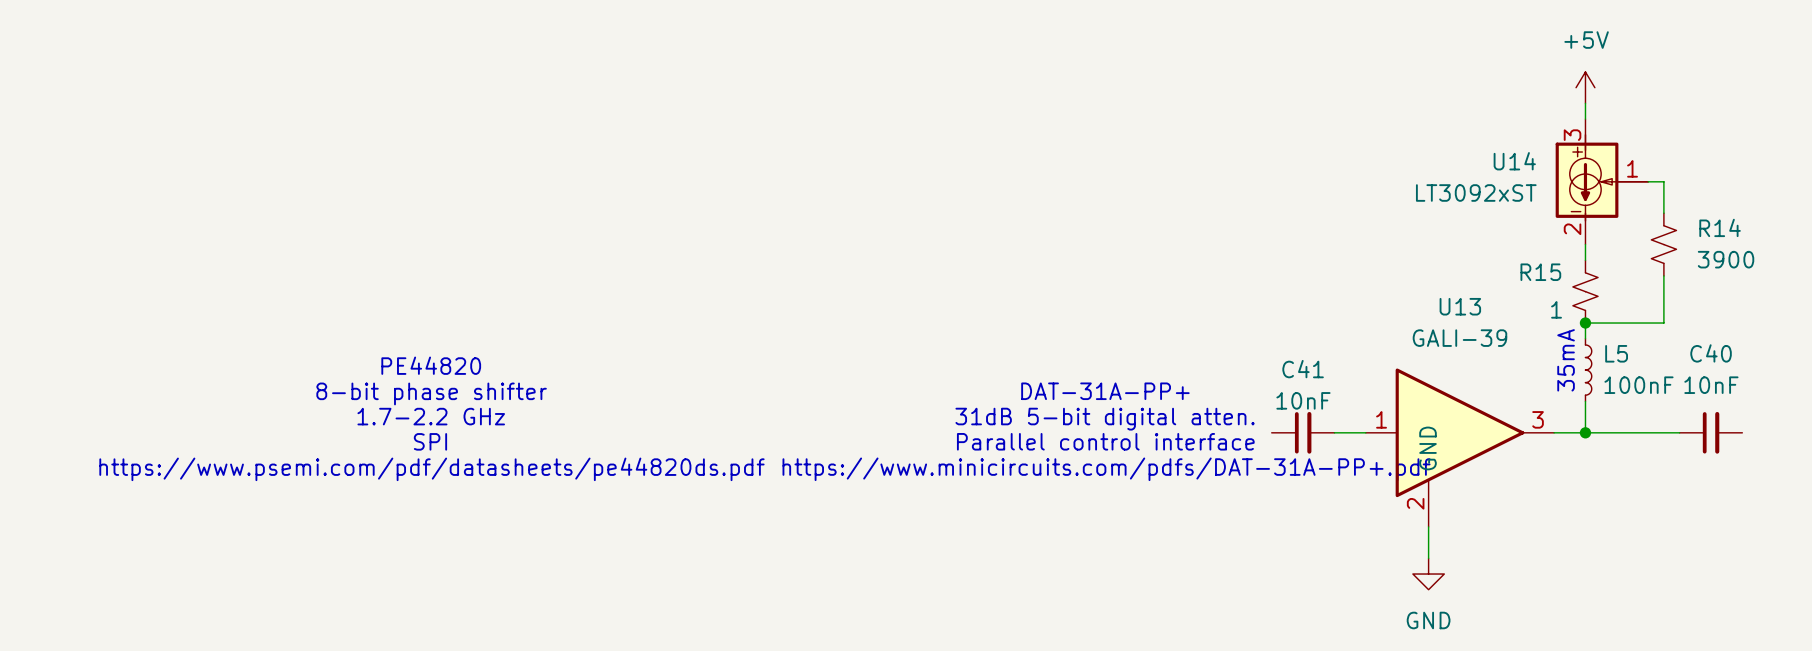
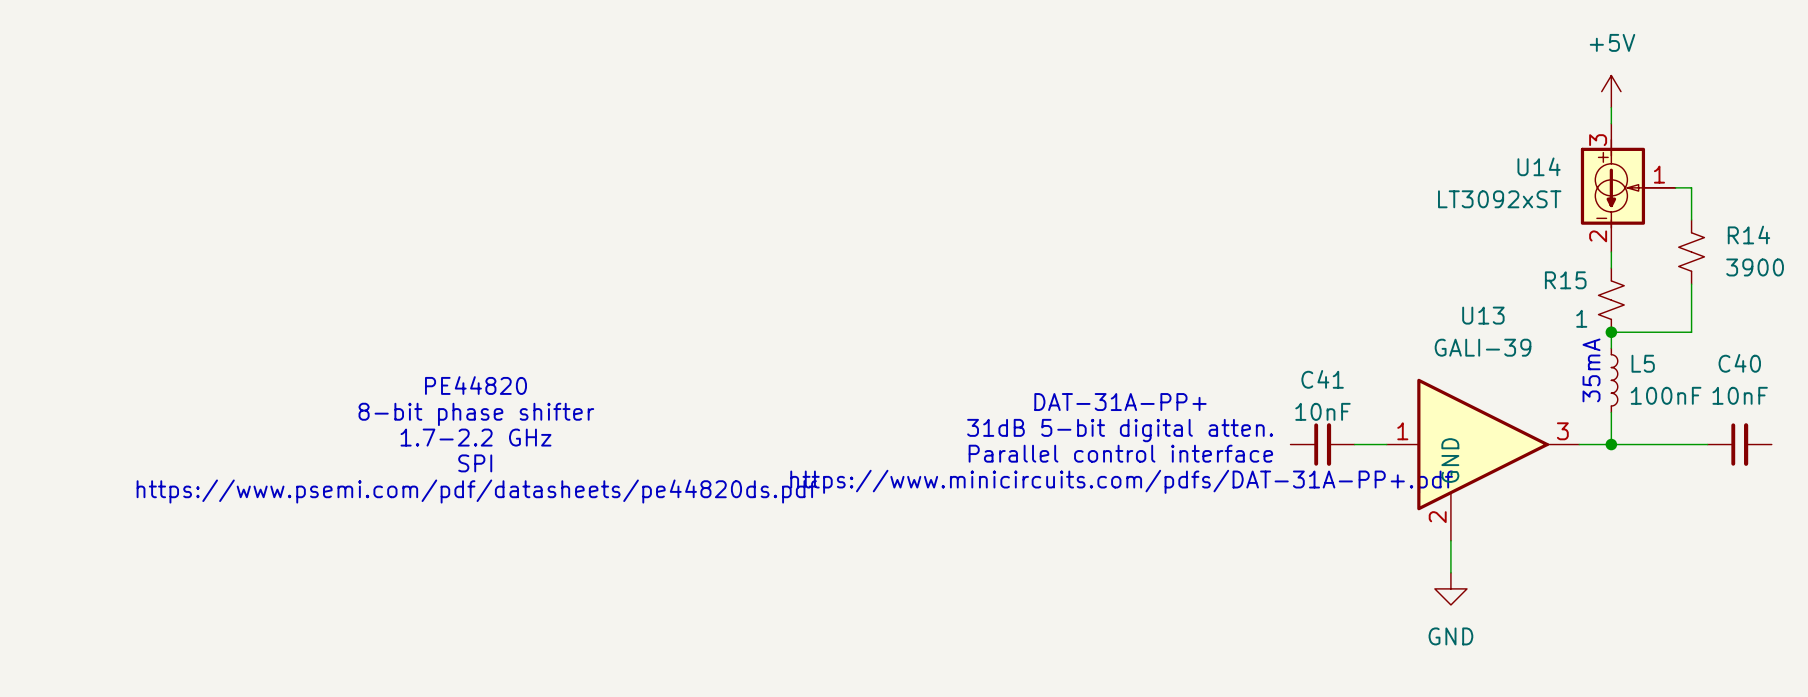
text position: PE44820 (431, 365) -> PE44820 (475, 385)
text position: 8-bit phase shifter (431, 393) -> 8-bit phase shifter (476, 414)
text position: 1.7-2.2 GHz (431, 416) -> 1.7-2.2 GHz (475, 437)
text position: SPI (430, 441) -> SPI (475, 463)
text position: https://www.psemi.com/pdf/datasheets/pe44820ds.pdf (431, 469) -> https://www.psemi.com/pdf/datasheets/pe44820ds.pdf (476, 491)

